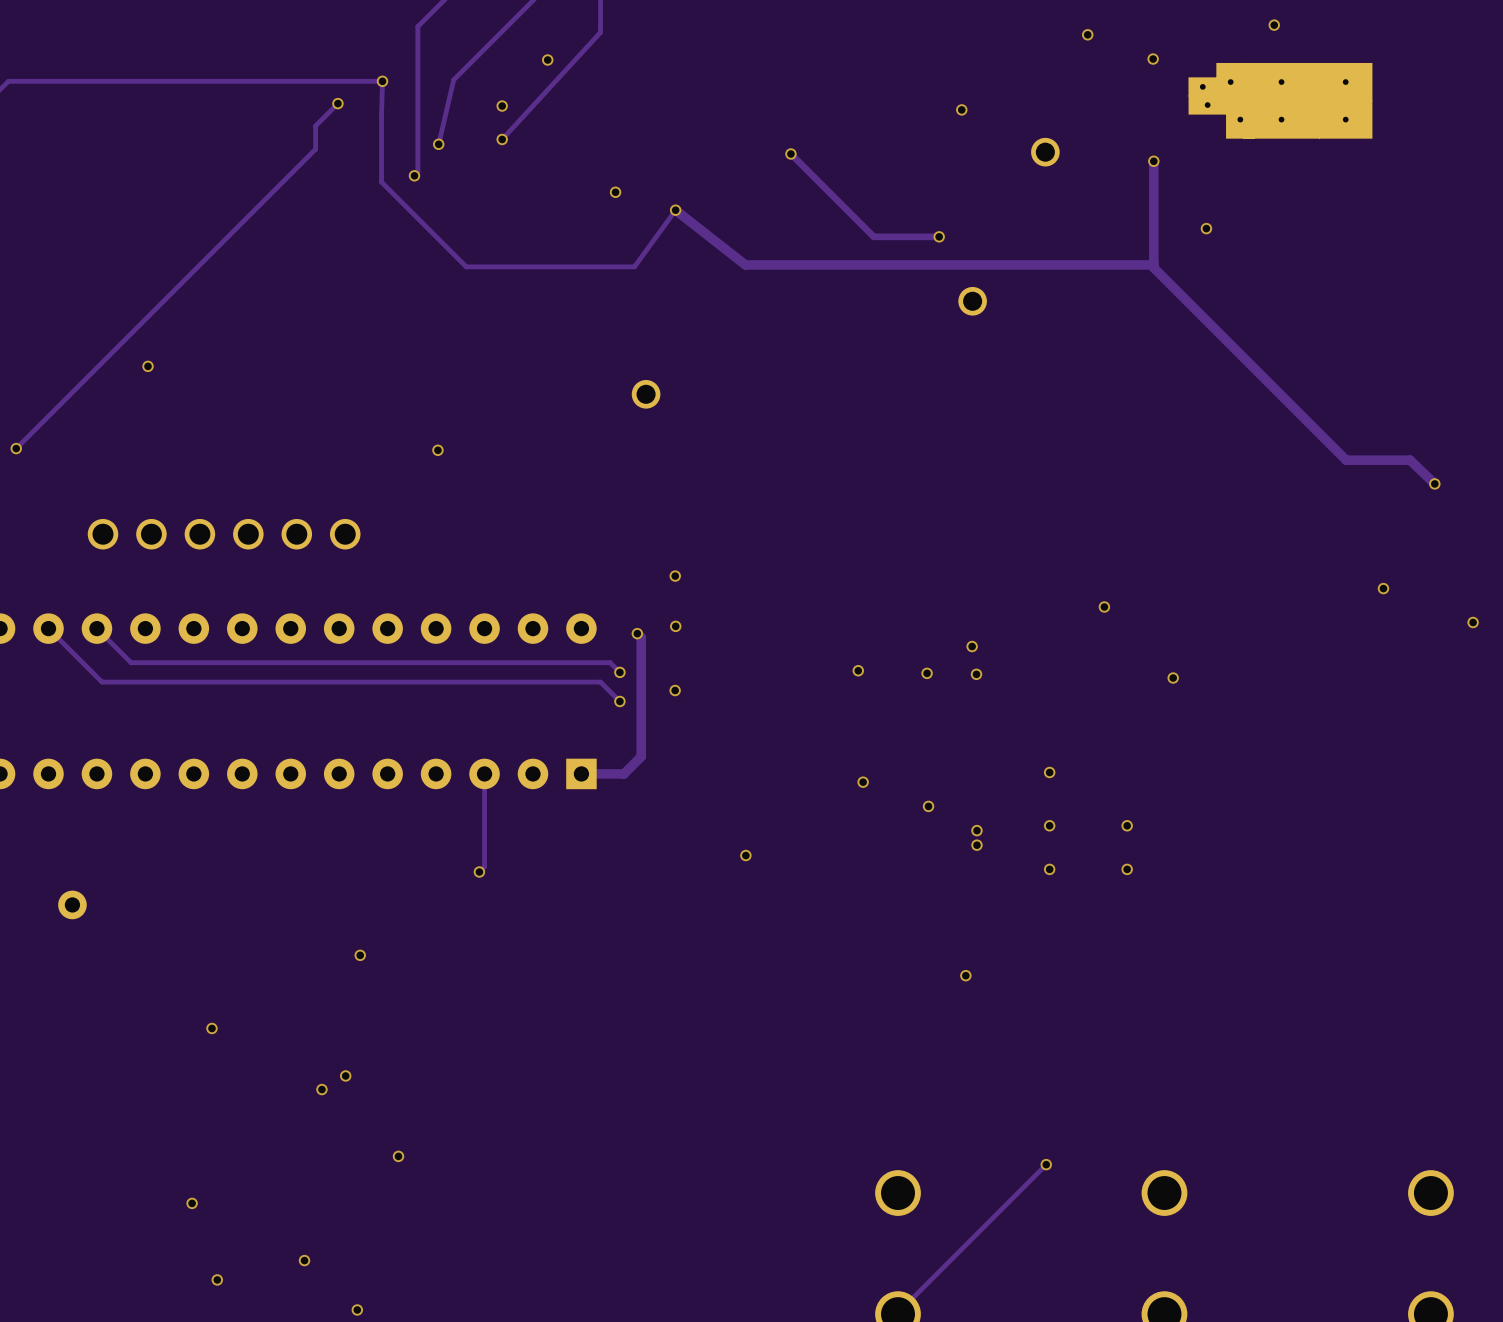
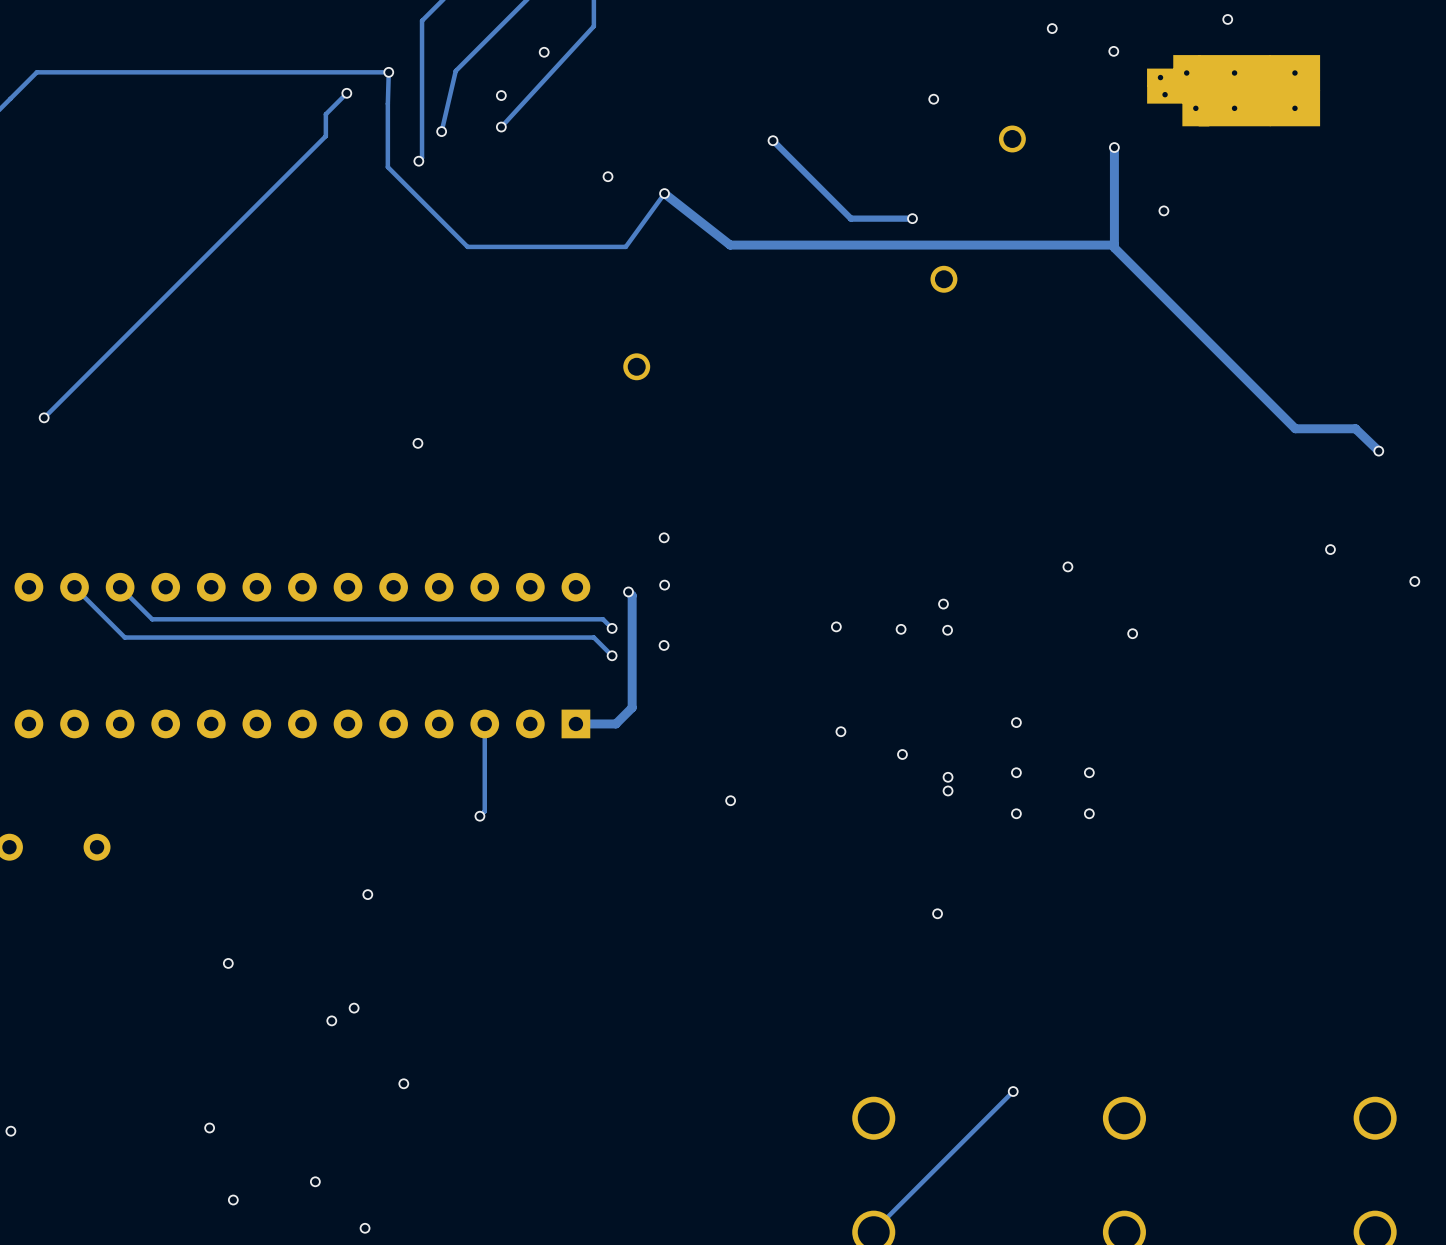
via: (148, 366) -> none
via position: (437, 450) -> (417, 443)
part: (224, 534) -> none

